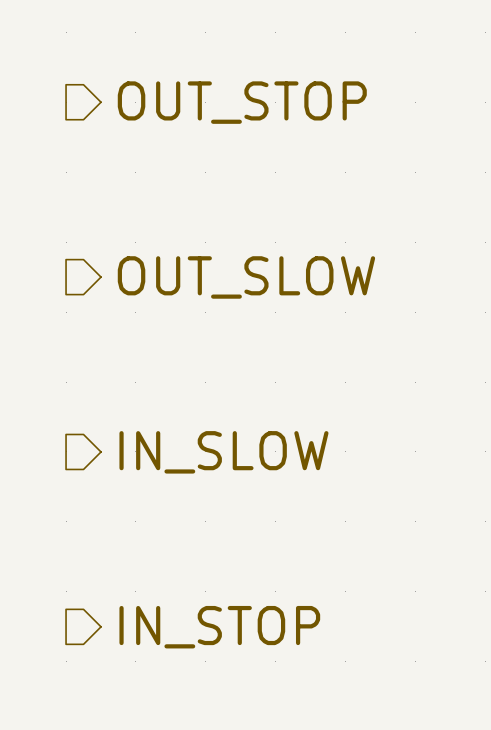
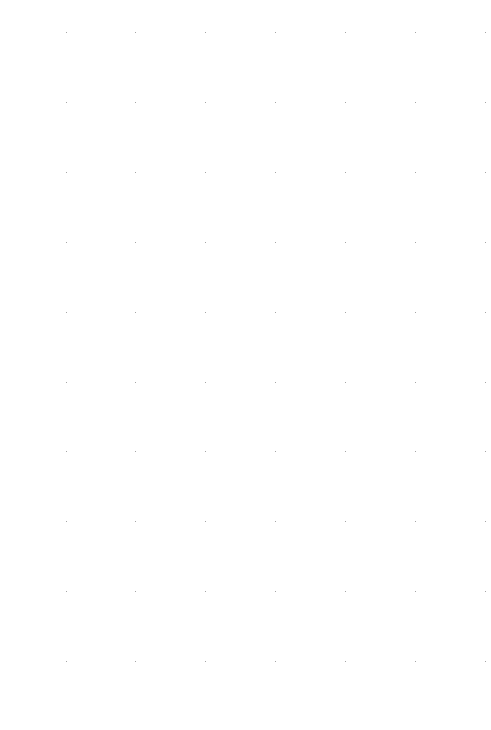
hierarchical label: OUT_STOP (242, 102) -> none
hierarchical label: OUT_SLOW (246, 277) -> none
hierarchical label: IN_SLOW (223, 452) -> none
hierarchical label: IN_STOP (219, 627) -> none

